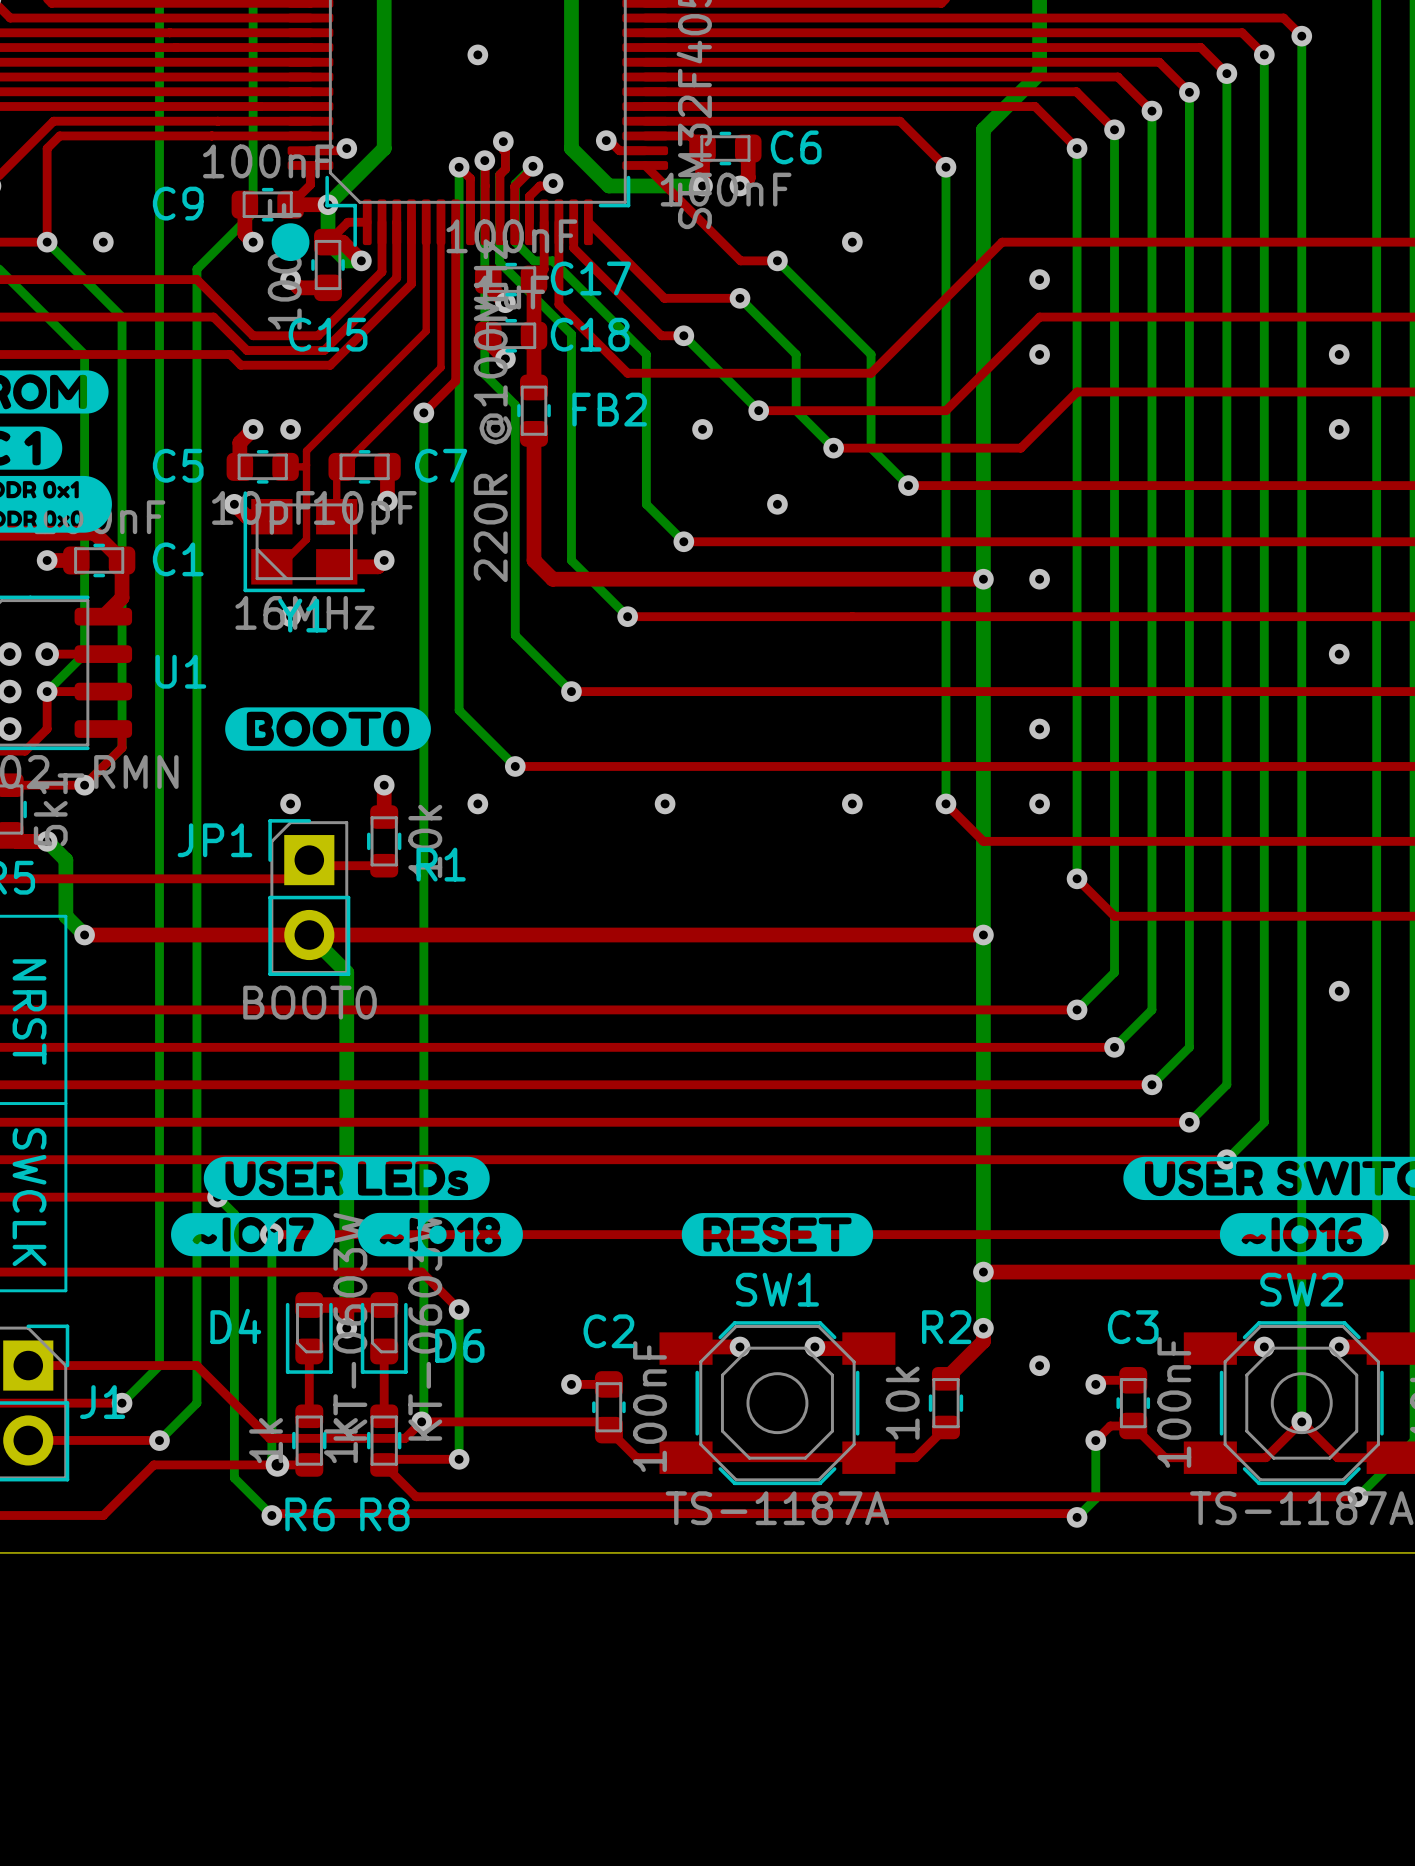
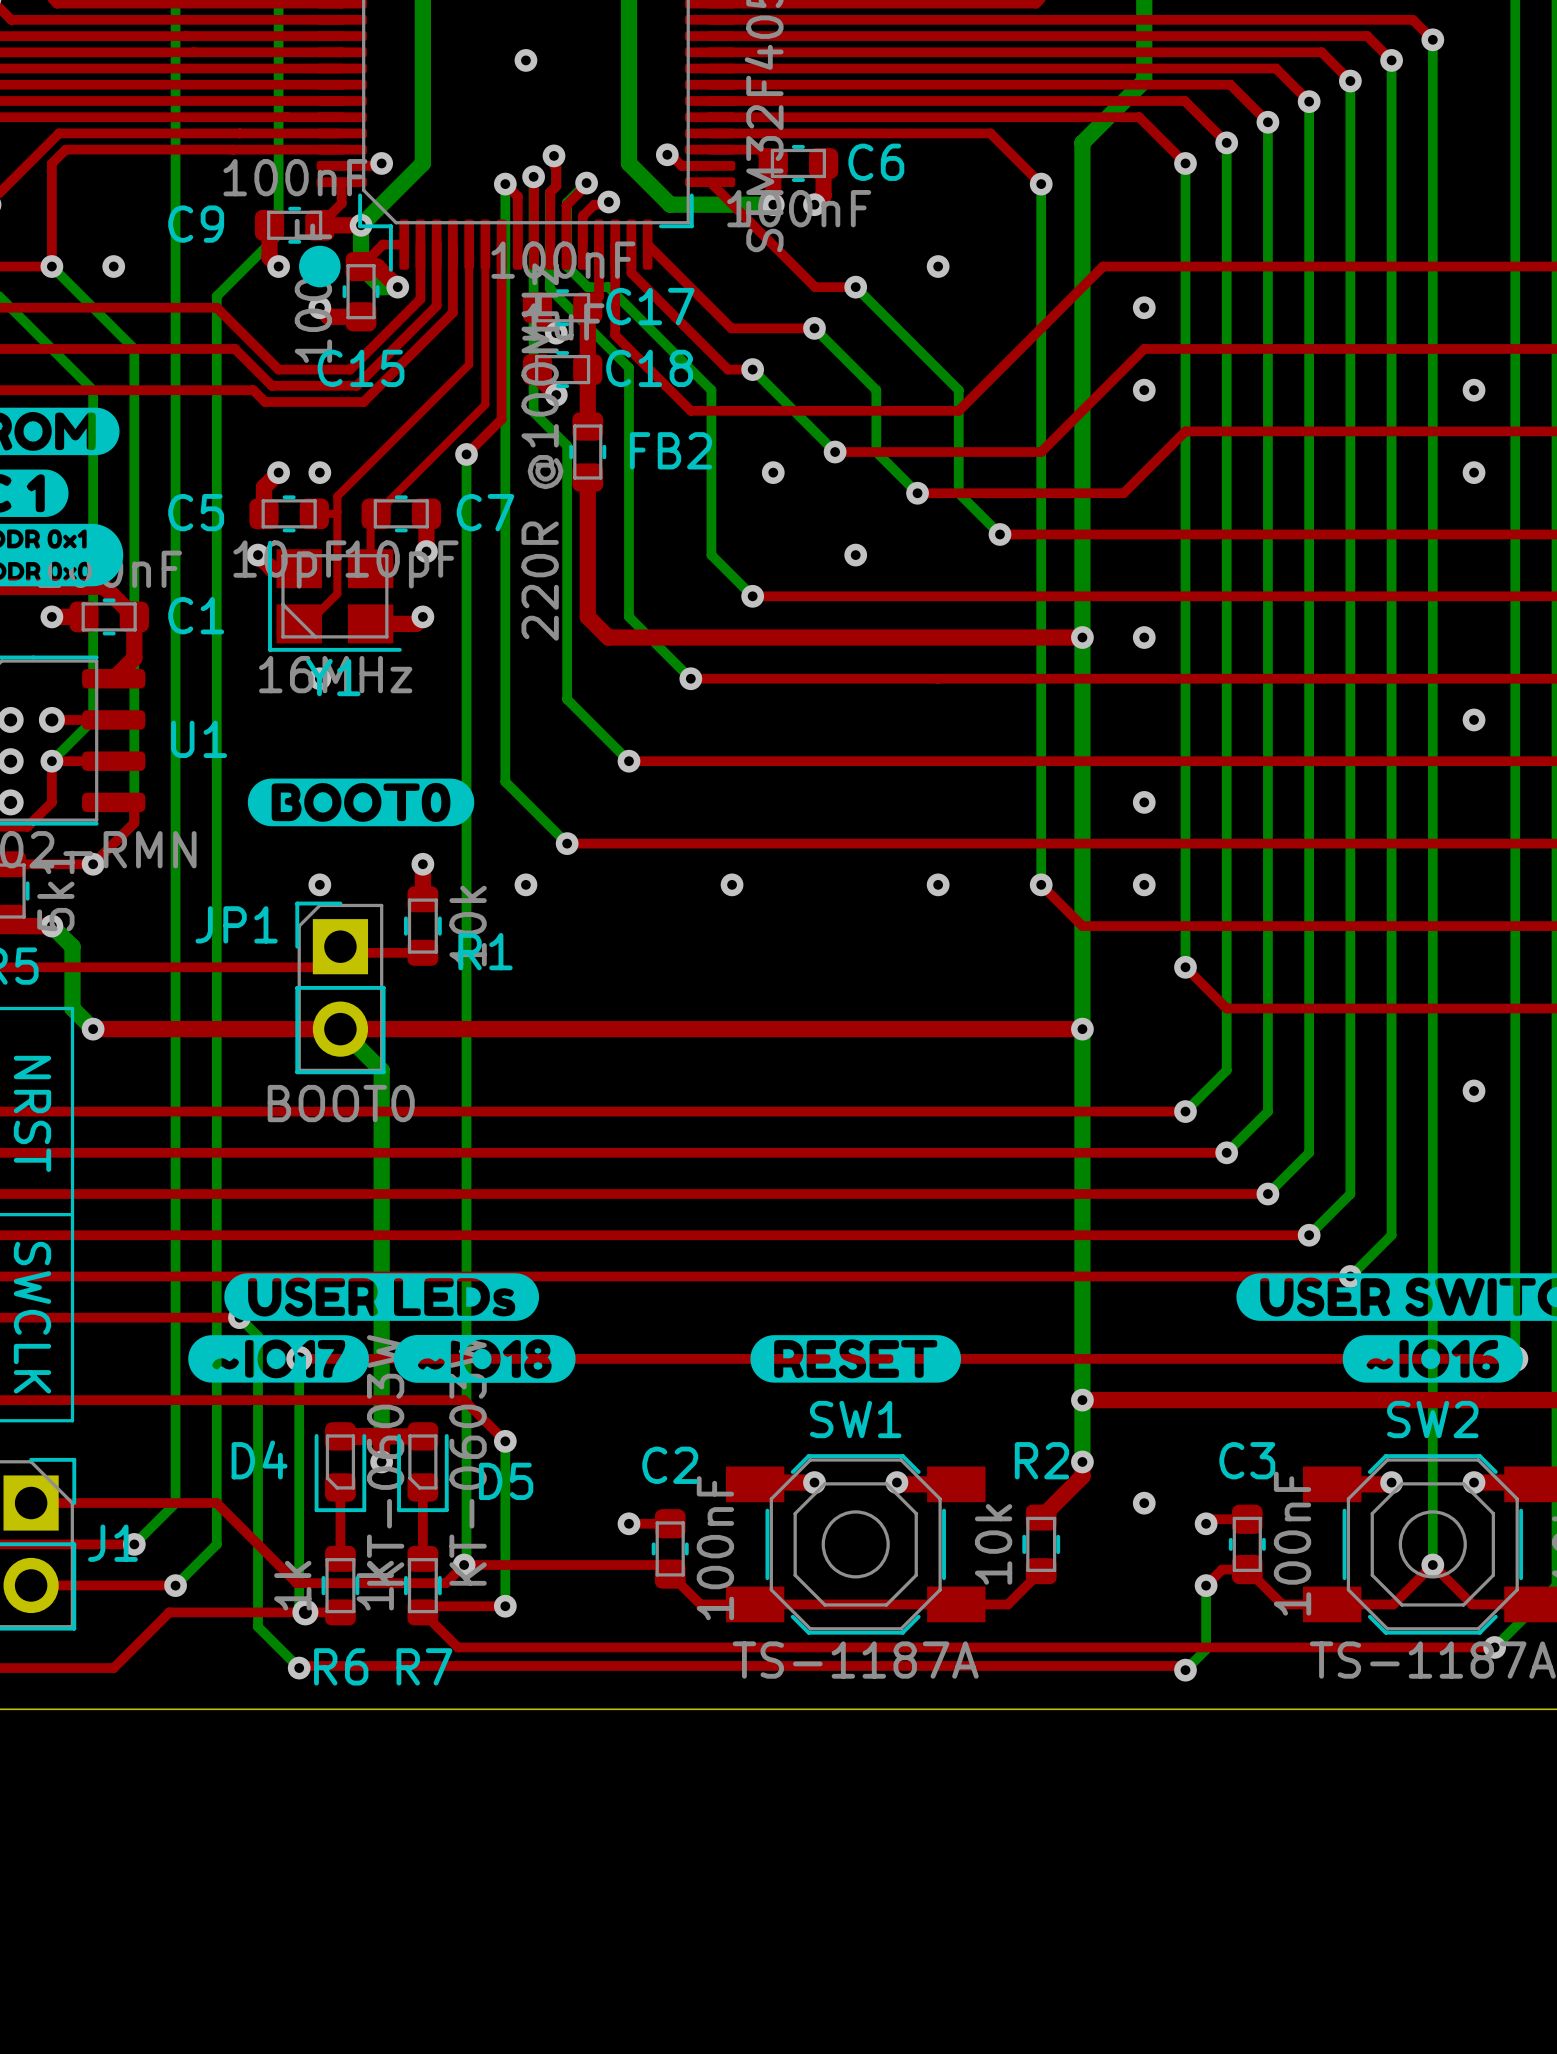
D6 name: D6 (459, 1345) -> D5 (506, 1481)
R8 name: R8 (384, 1514) -> R7 (424, 1666)

